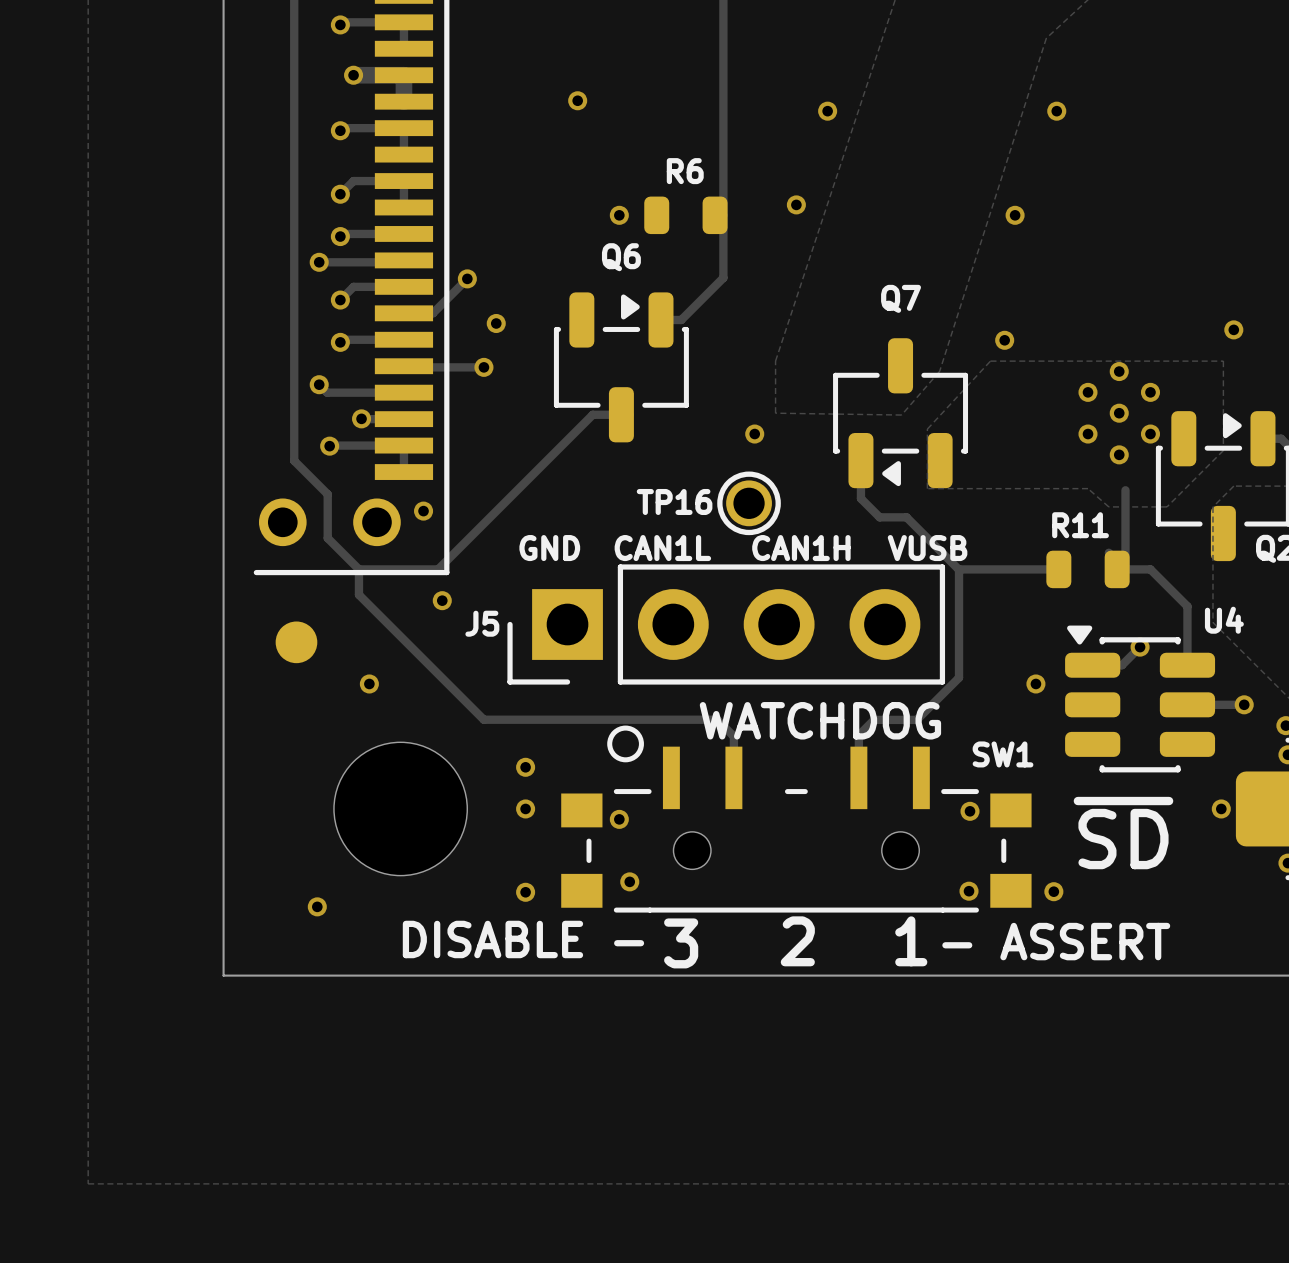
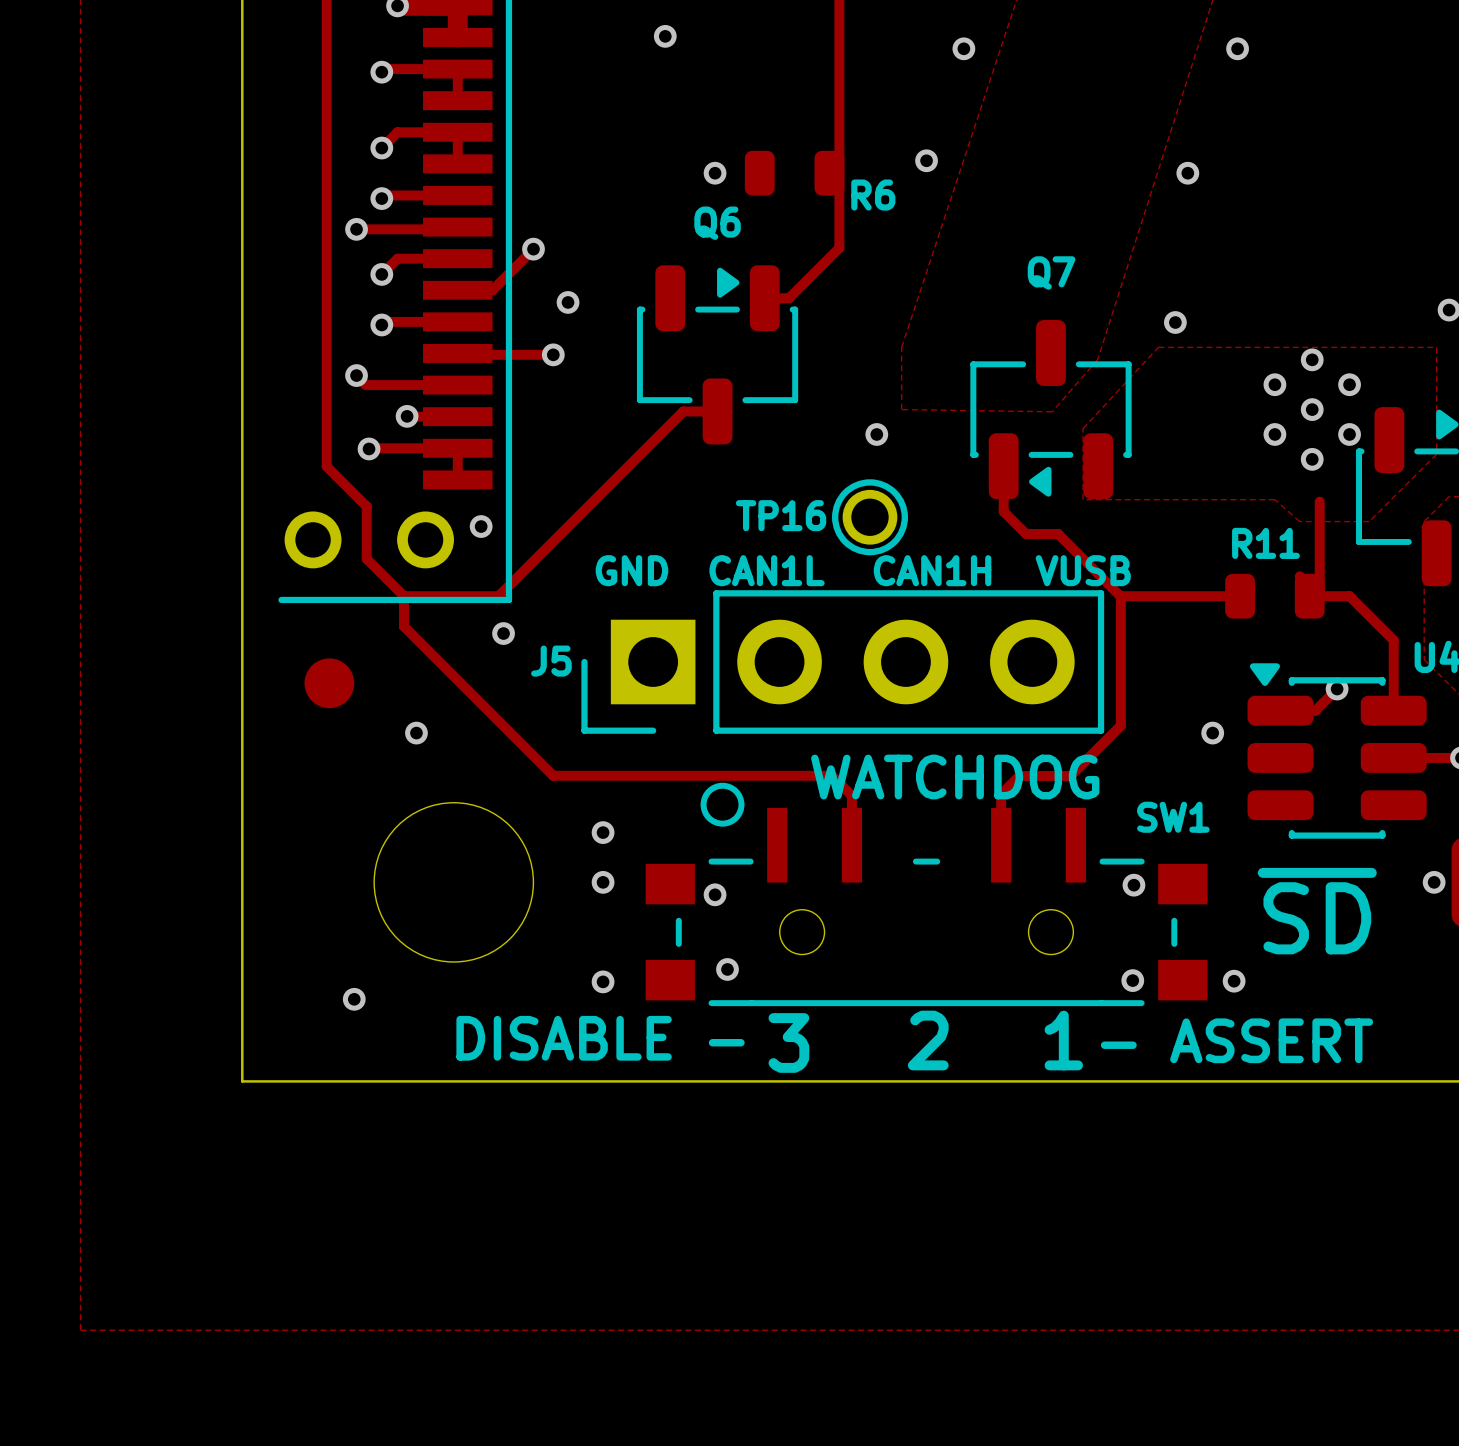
R6 name position: R6 (685, 171) -> R6 (873, 195)

